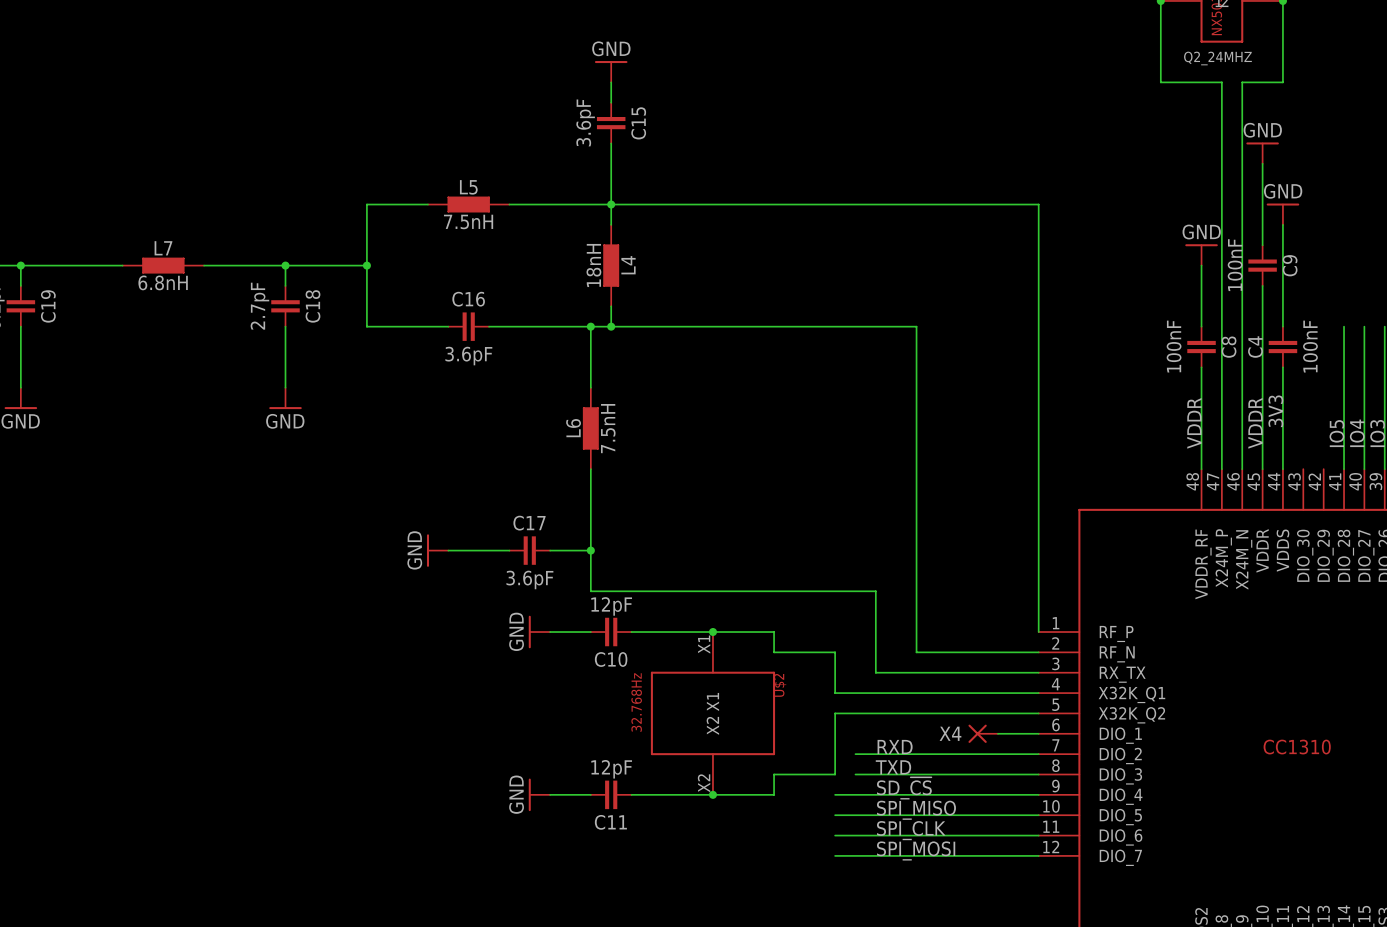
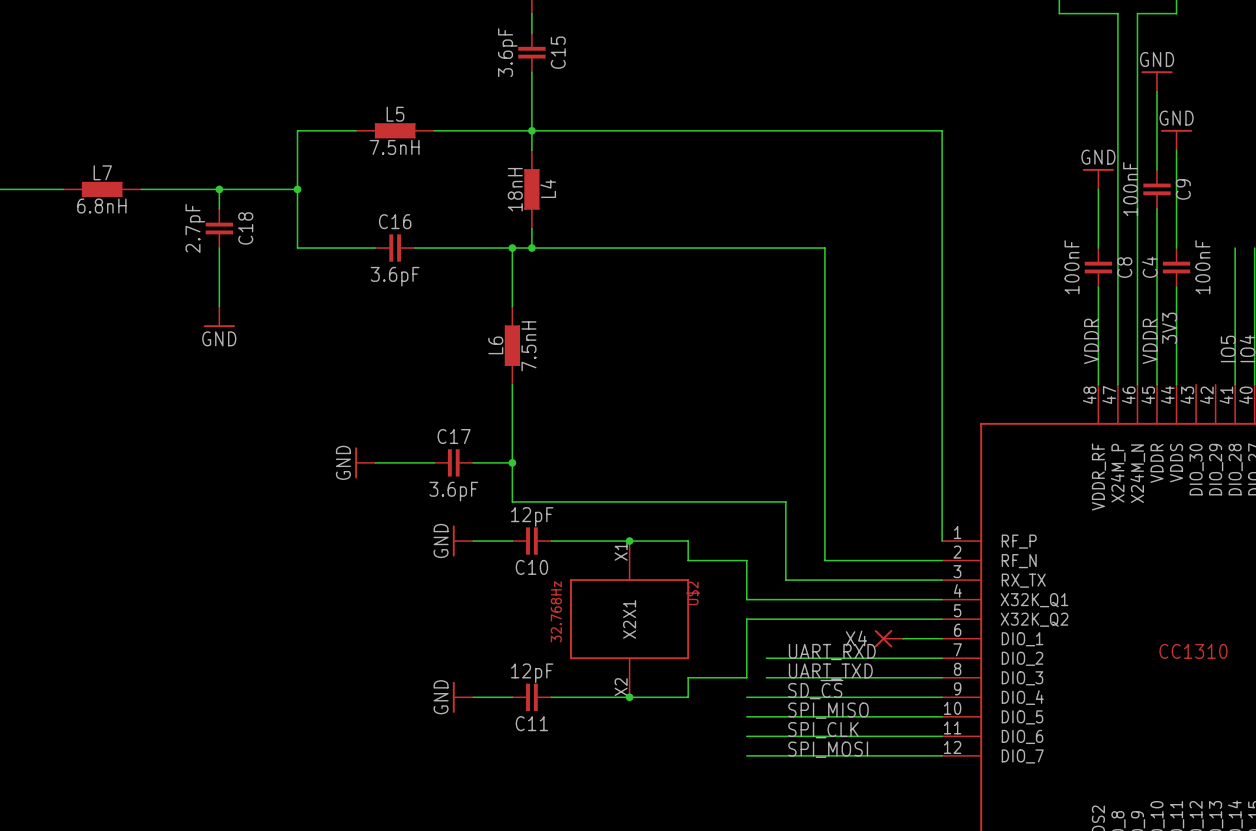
label: RXD (895, 747) -> UART_RXD (832, 652)
label: TXD (893, 767) -> UART_TXD (830, 671)

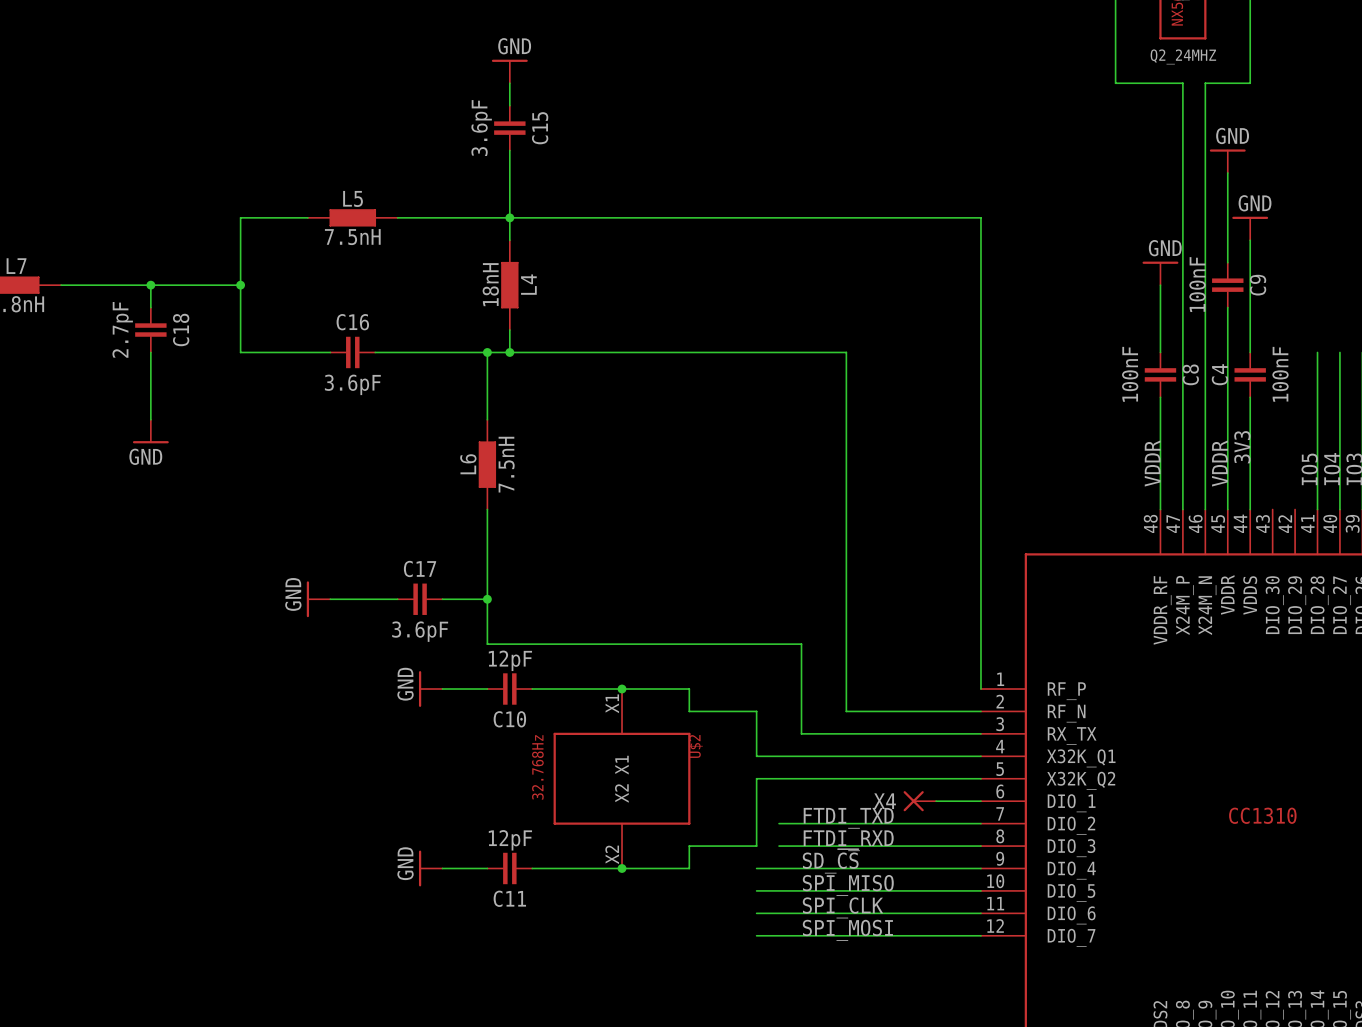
label: UART_RXD (832, 652) -> FTDI_TXD (848, 818)
label: UART_TXD (830, 671) -> FTDI_RXD (848, 840)

